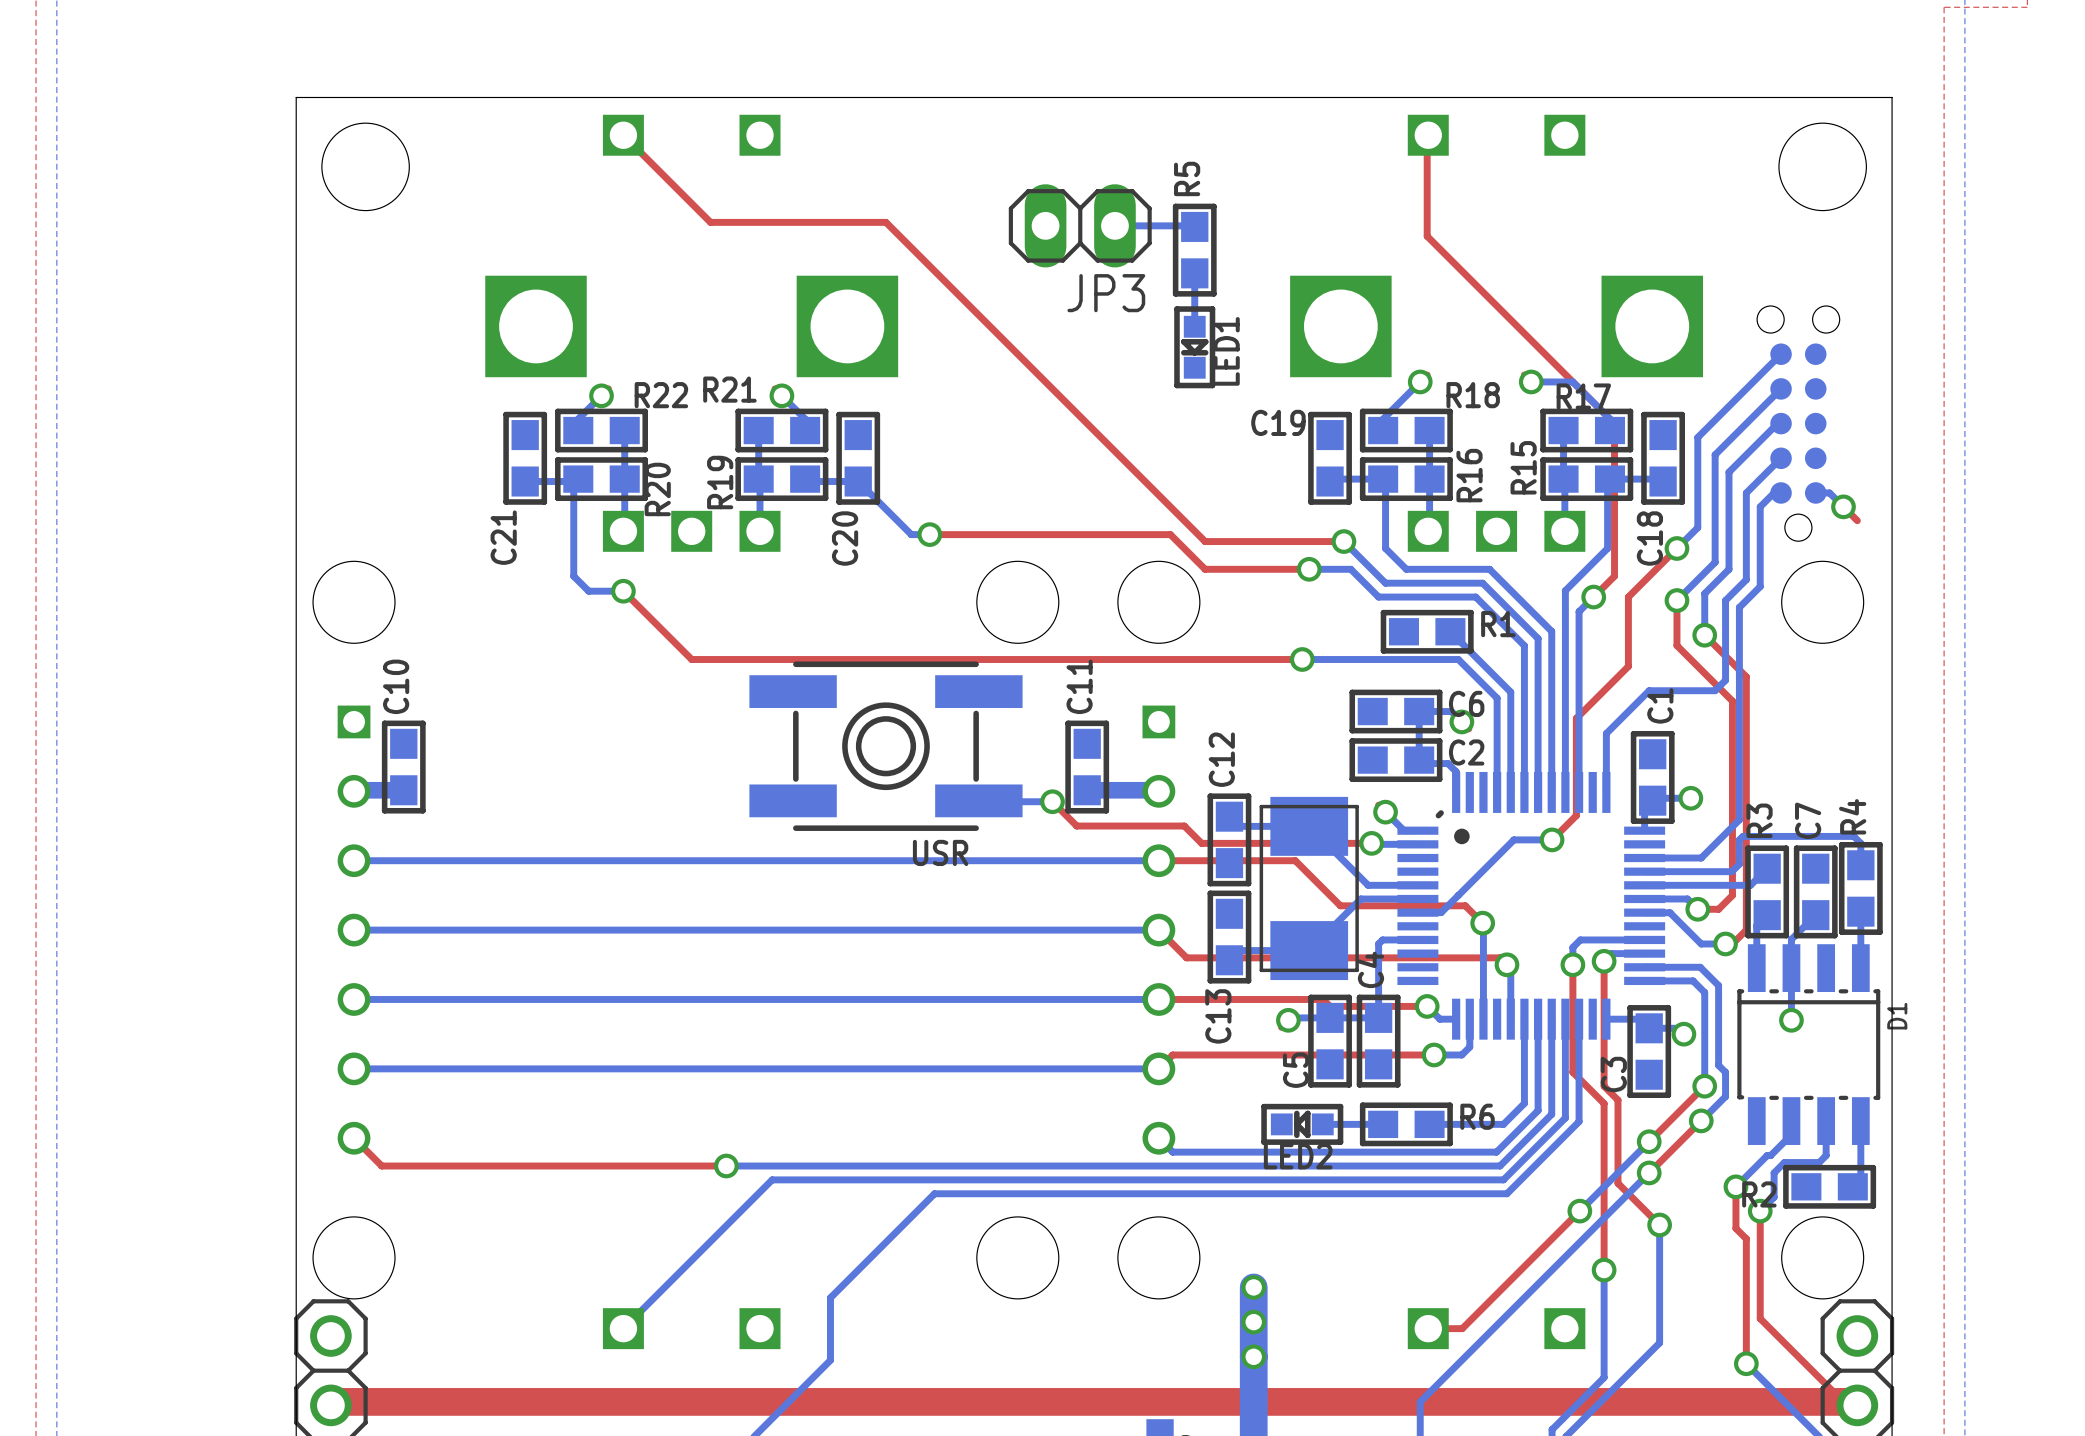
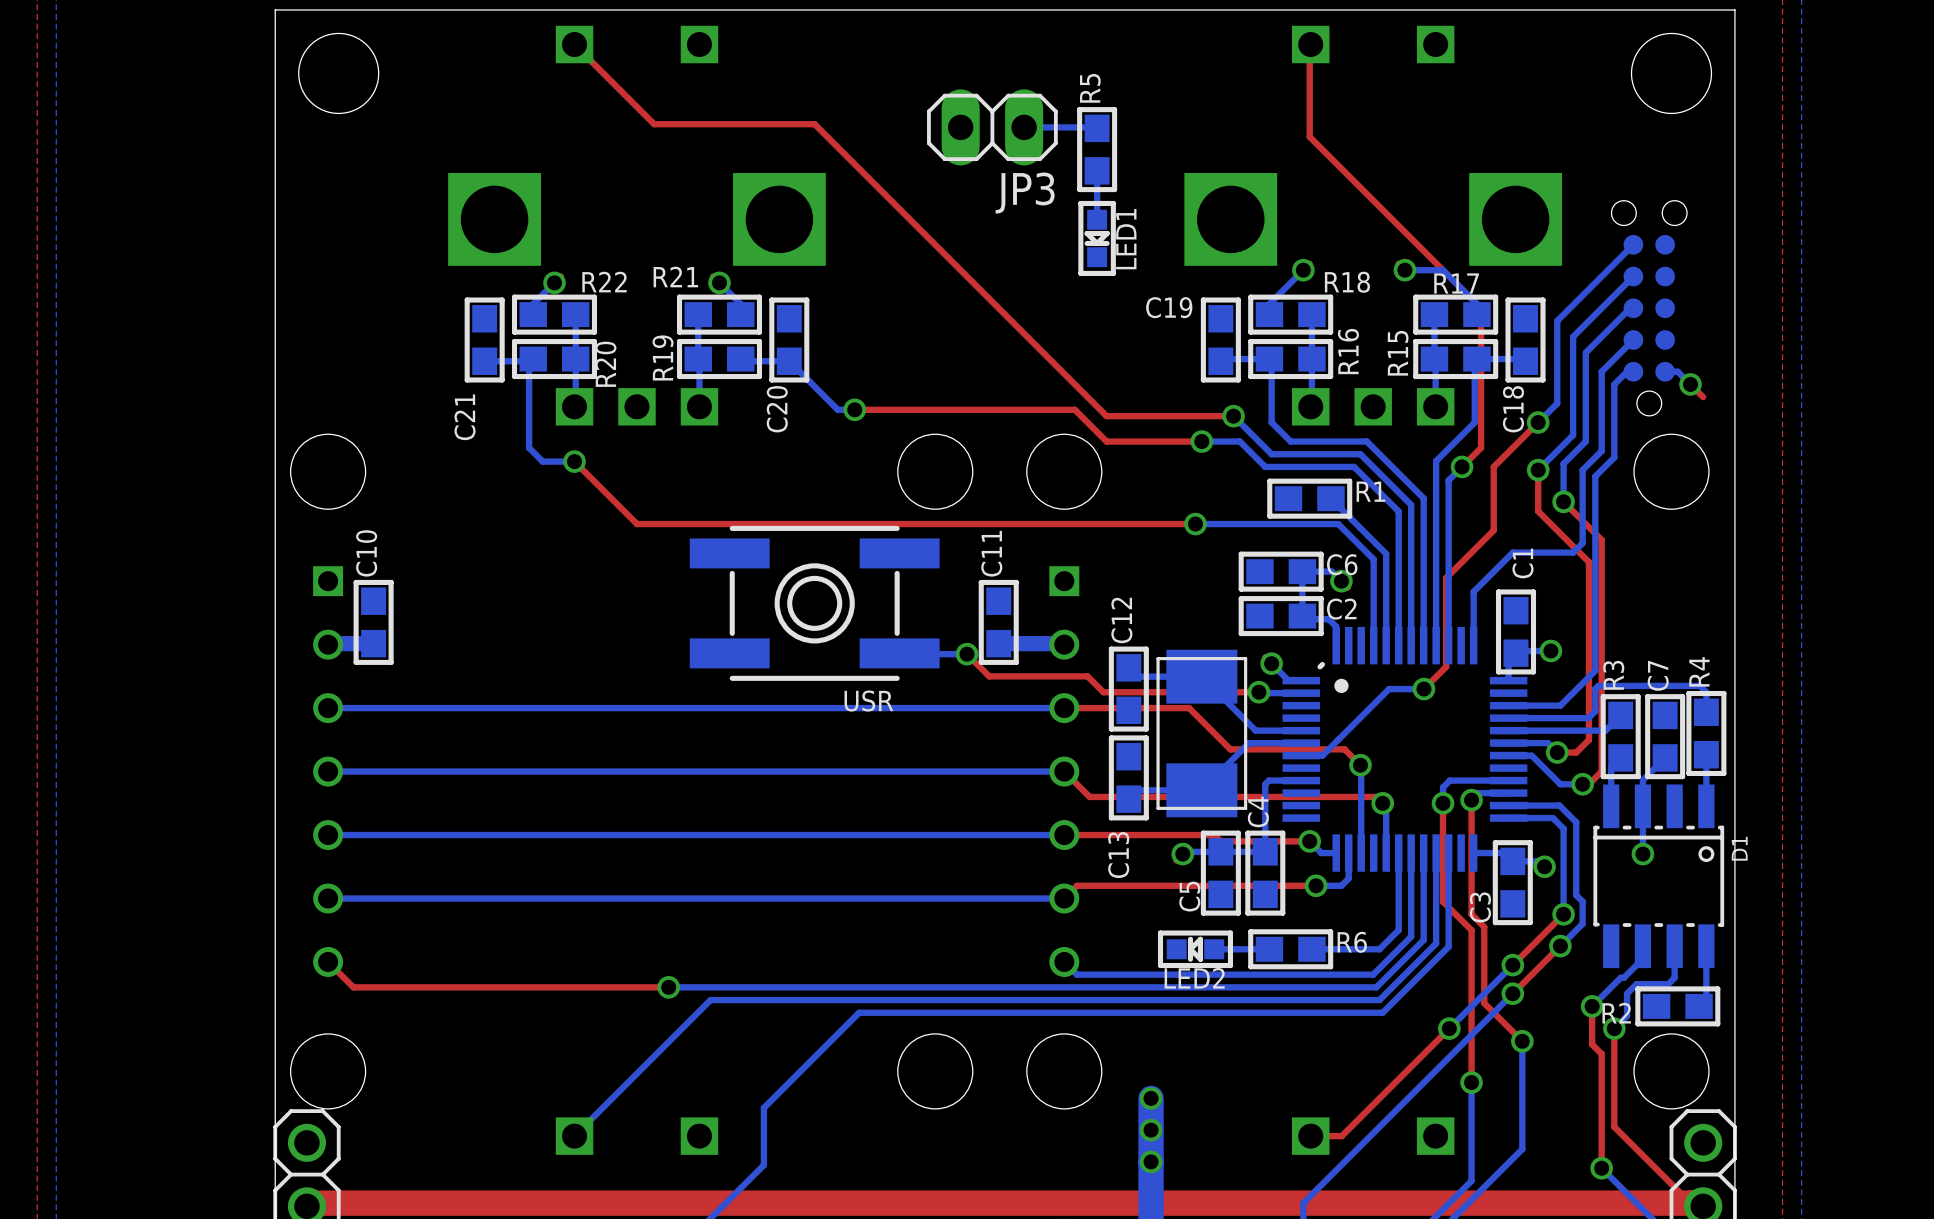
D1 footprint: [1737, 944, 1881, 1145] -> [1593, 784, 1725, 969]

